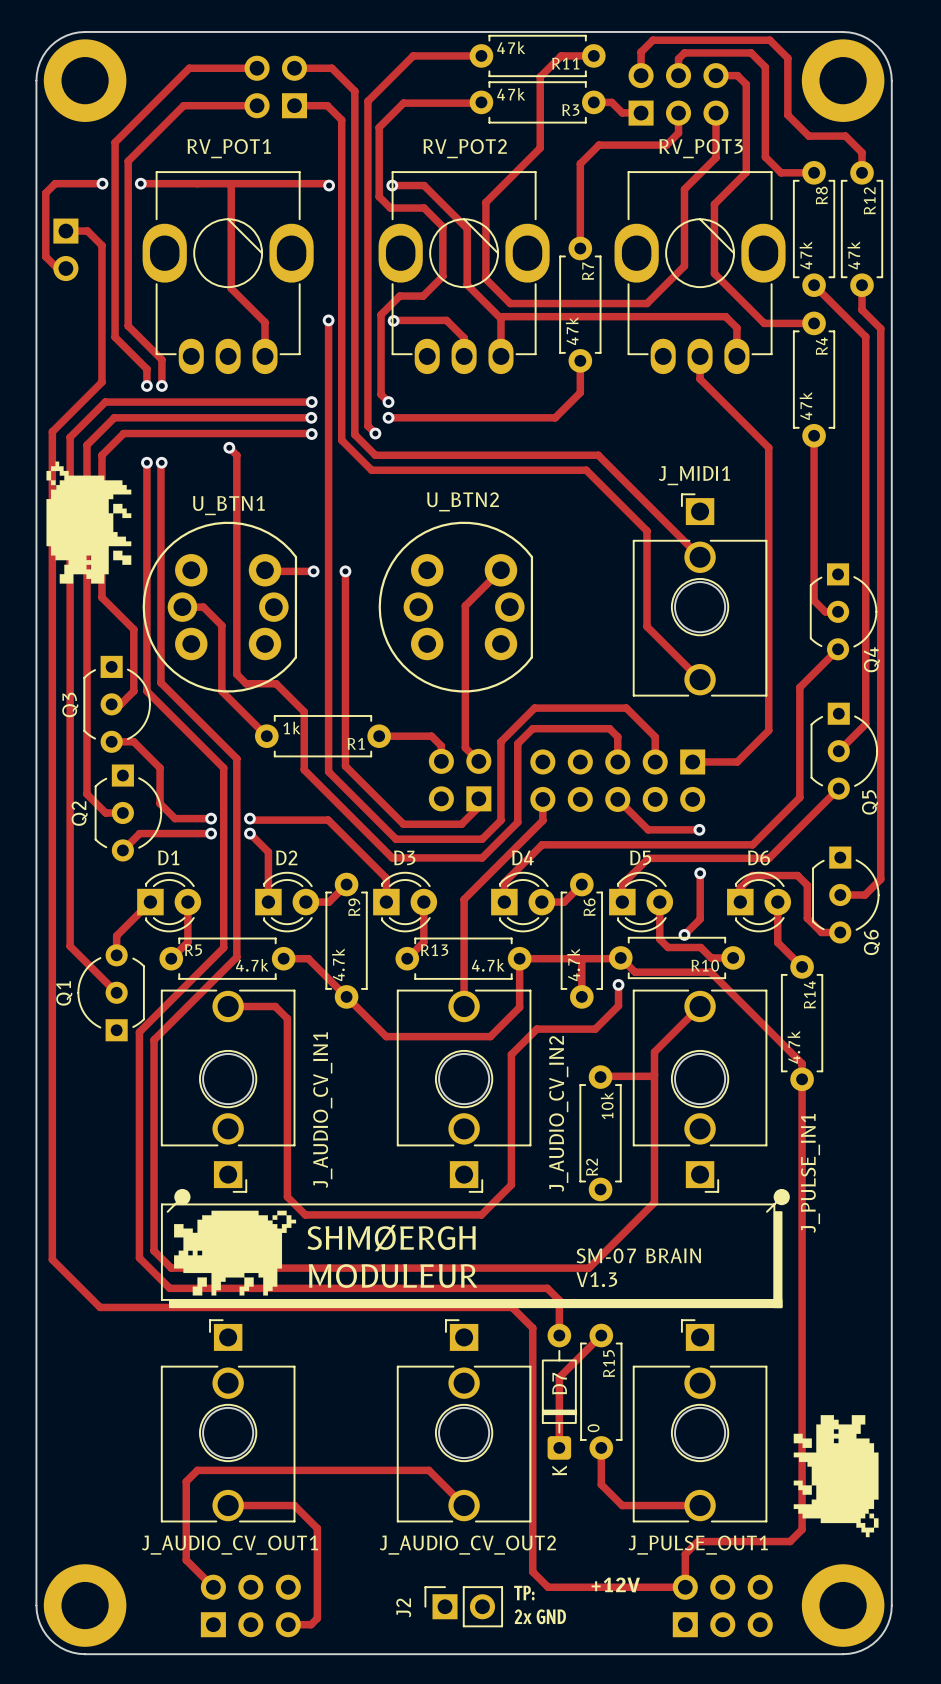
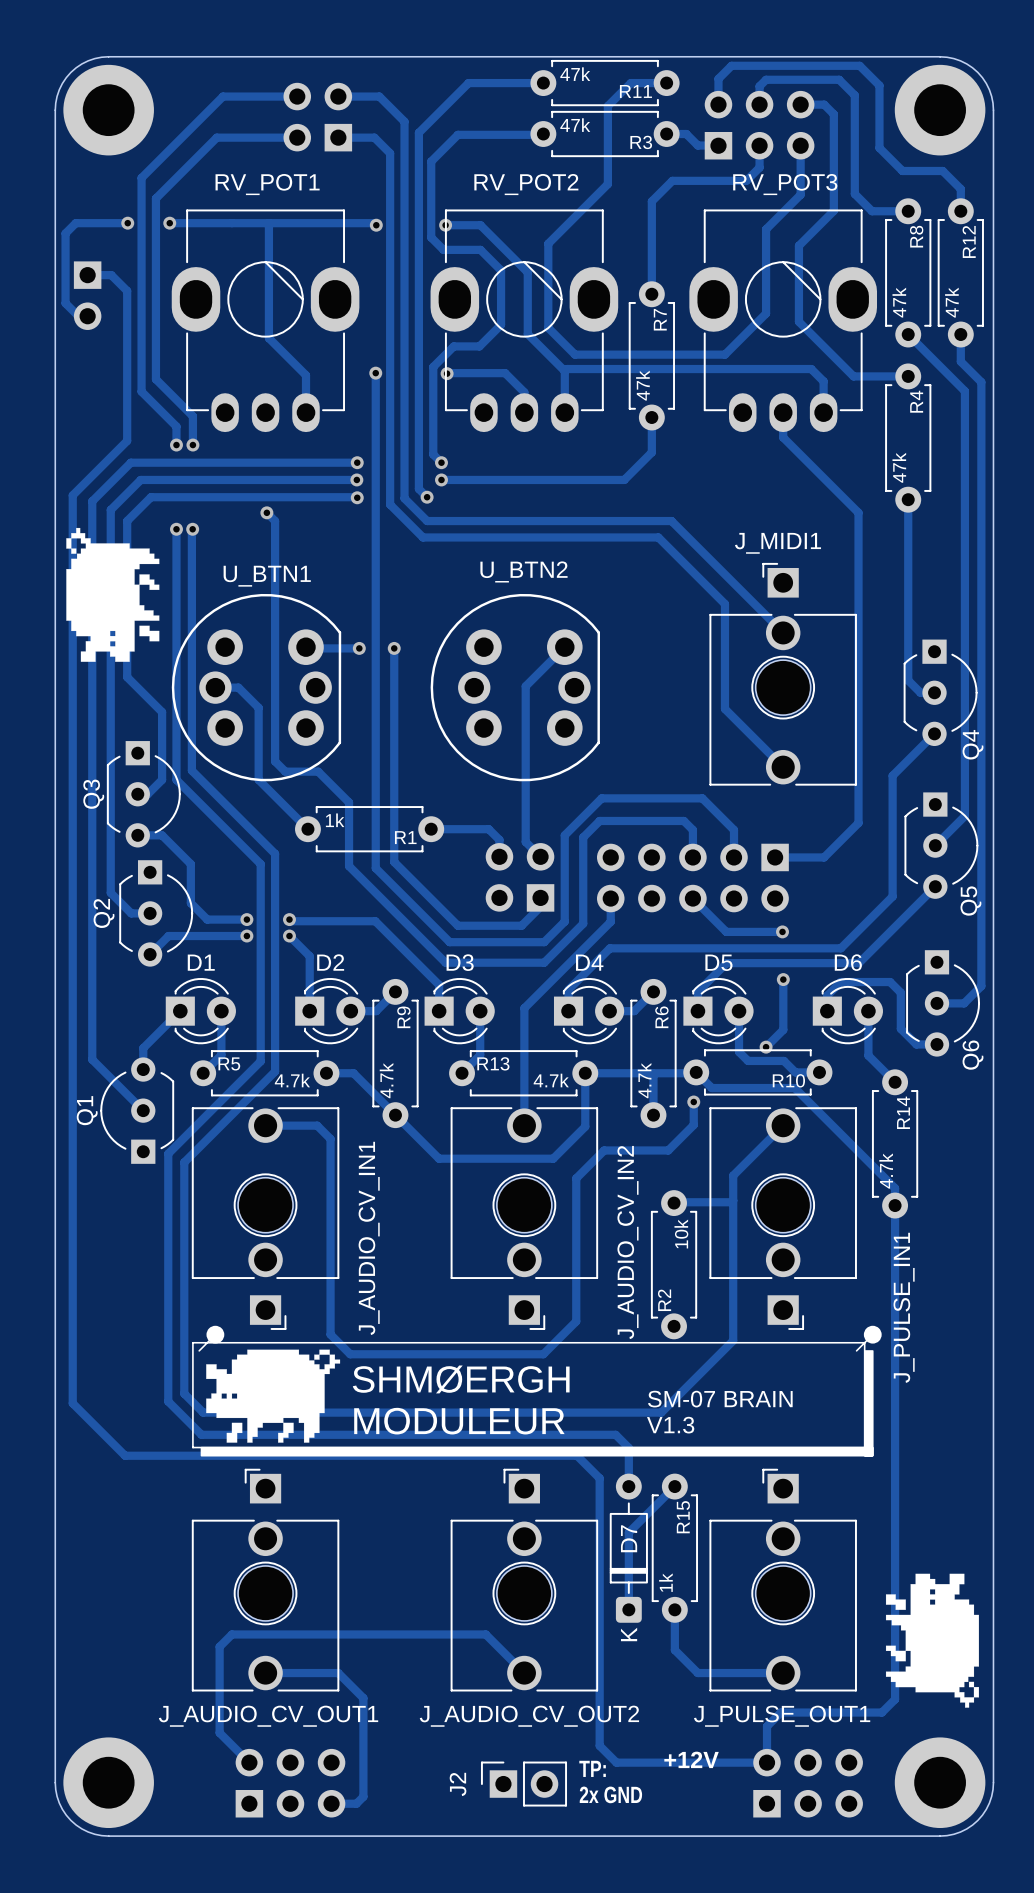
R15 value: 0 (593, 1428) -> 1k (665, 1582)

